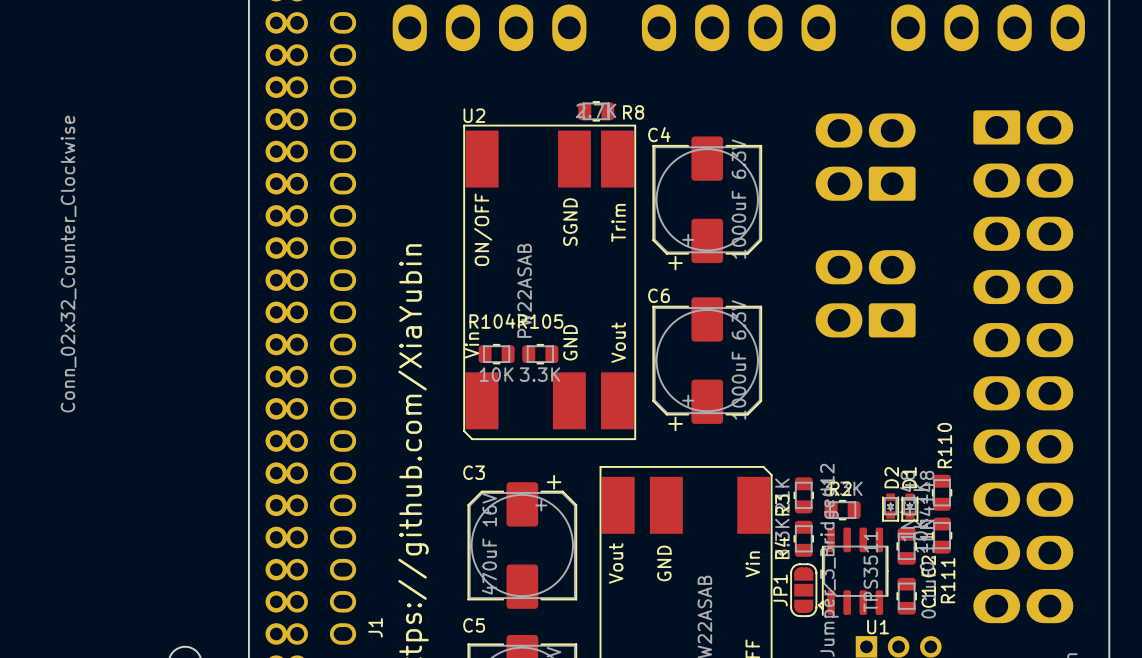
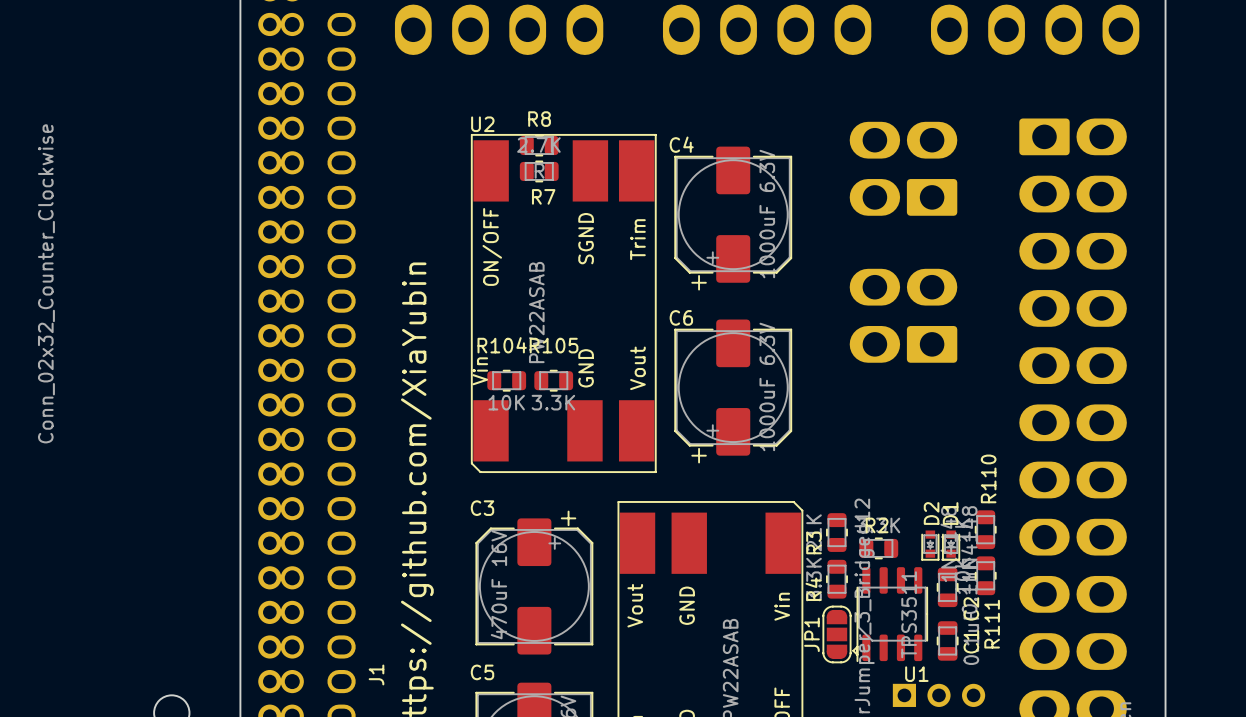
R8 position: (596, 111) -> (539, 145)
R8 name position: R8 (633, 112) -> R8 (539, 119)
R7: none -> R (539, 171)

